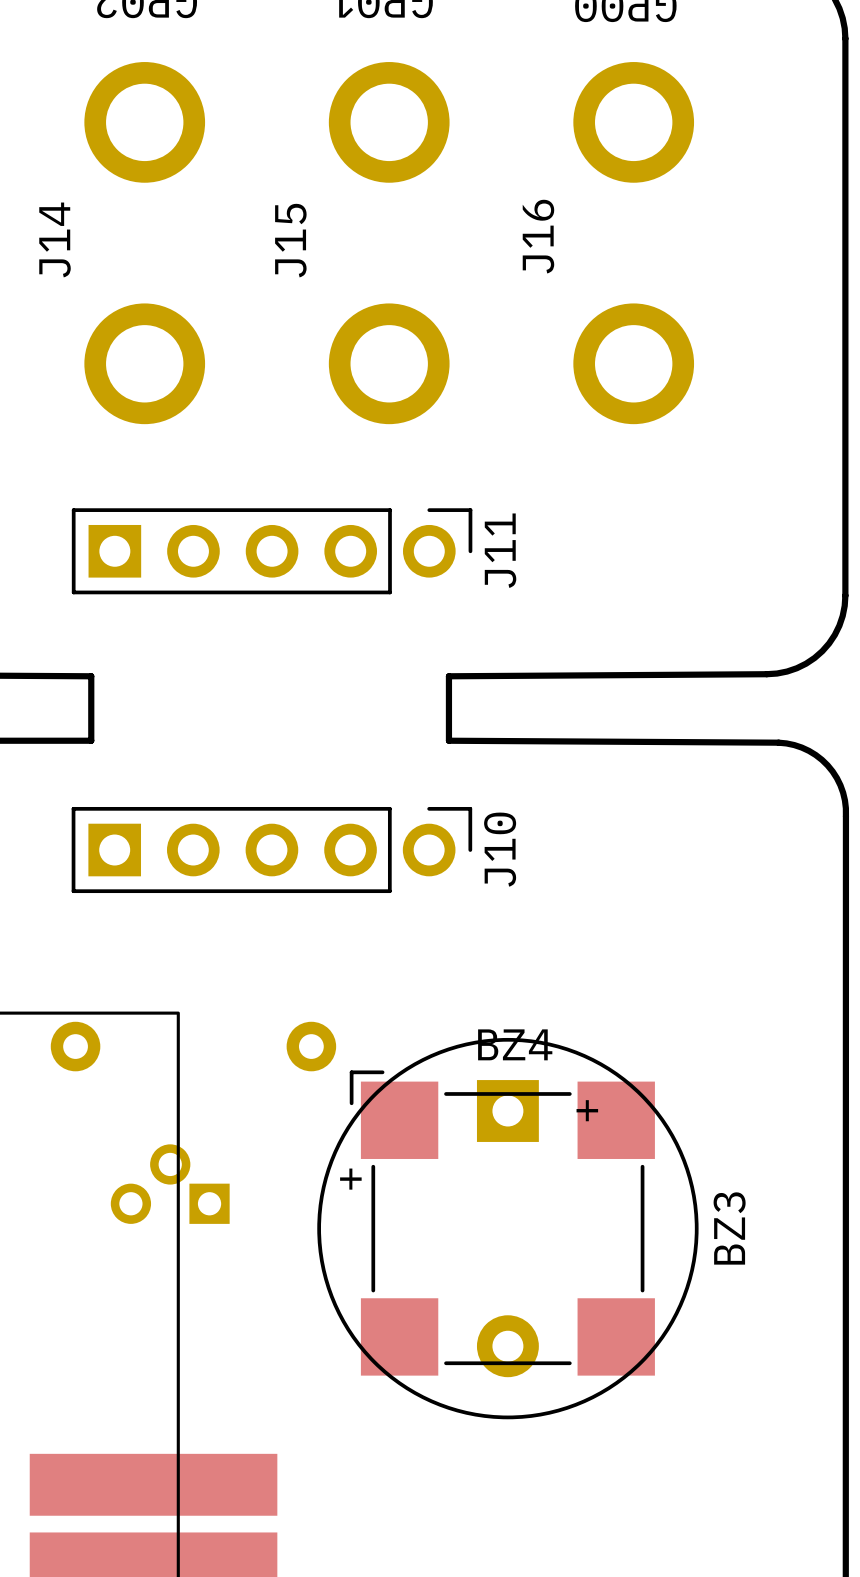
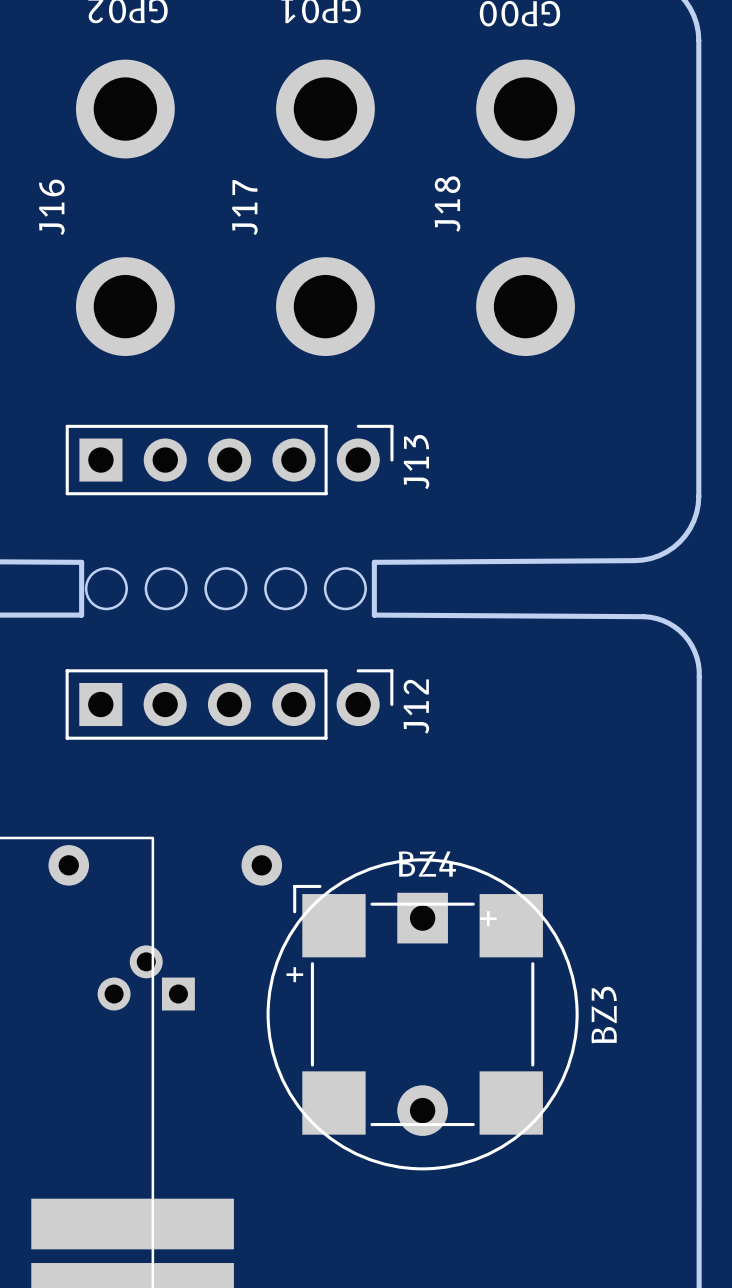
J16 name: J16 (538, 236) -> J18 (447, 204)
J14 name: J14 (55, 239) -> J16 (51, 207)
J15 name: J15 (290, 240) -> J17 (244, 207)
J11 name: J11 (500, 550) -> J13 (416, 462)
round board edge: none -> [84, 567, 128, 611]
round board edge: none -> [144, 567, 188, 611]
round board edge: none -> [204, 567, 248, 611]
round board edge: none -> [264, 567, 308, 611]
round board edge: none -> [323, 567, 367, 611]
J10 name: J10 (500, 849) -> J12 (416, 706)

